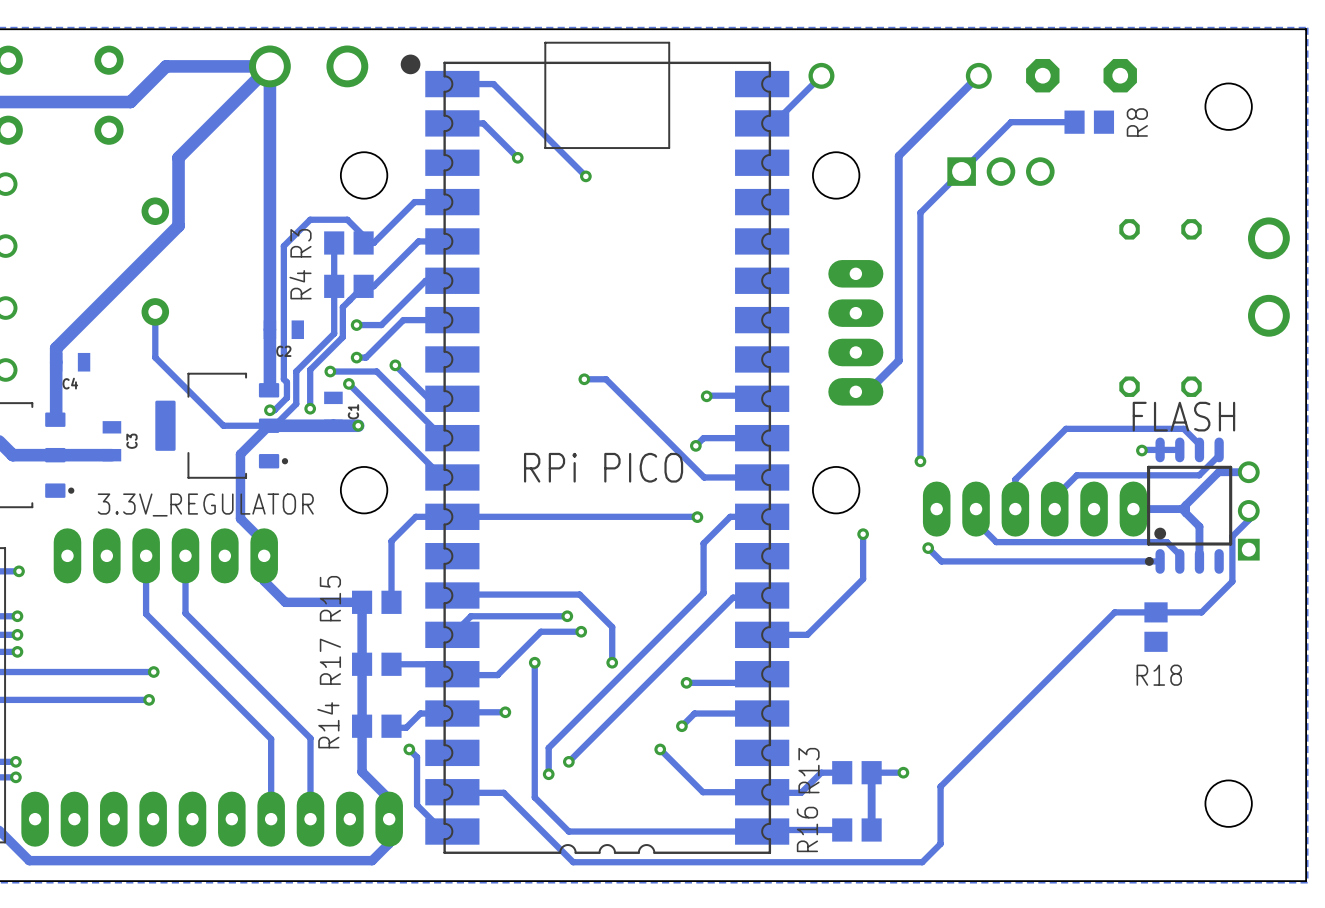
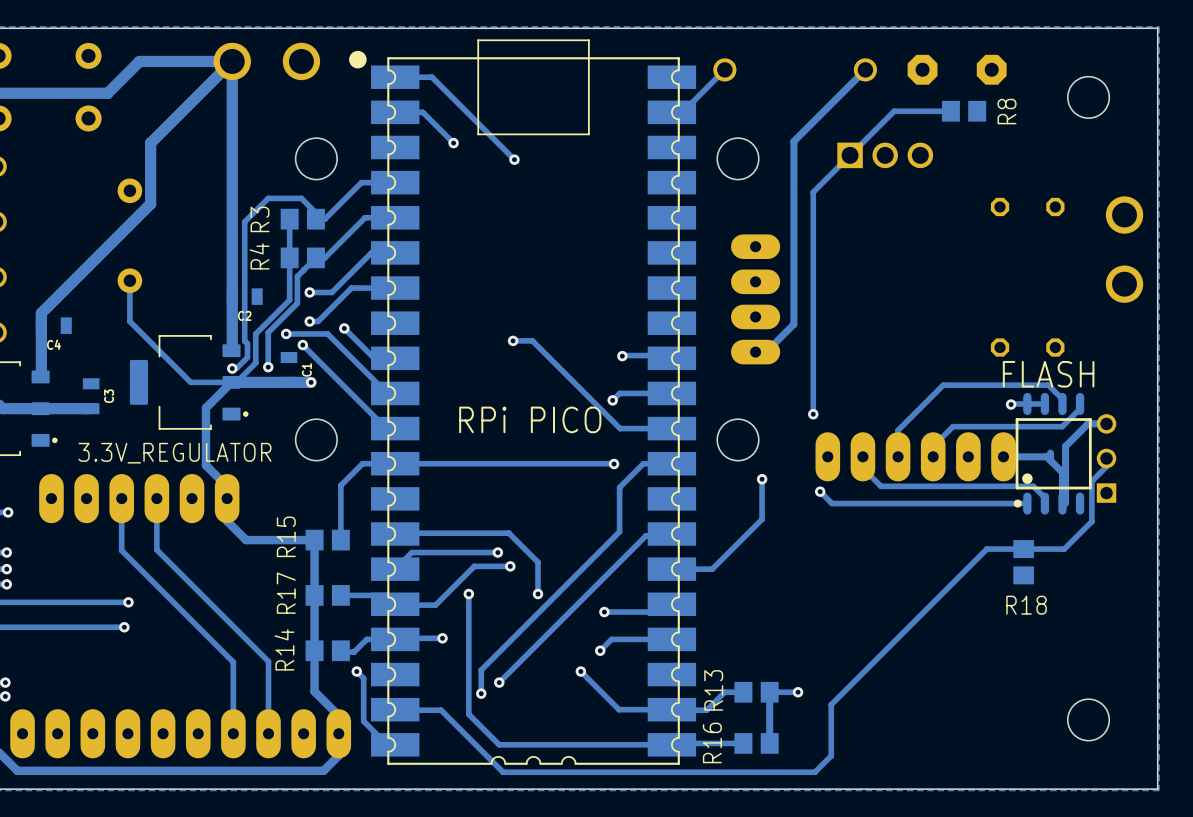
track: (1228, 472) (1218, 472) (1181, 509) -> (1088, 423) (1065, 446) (1065, 503)

